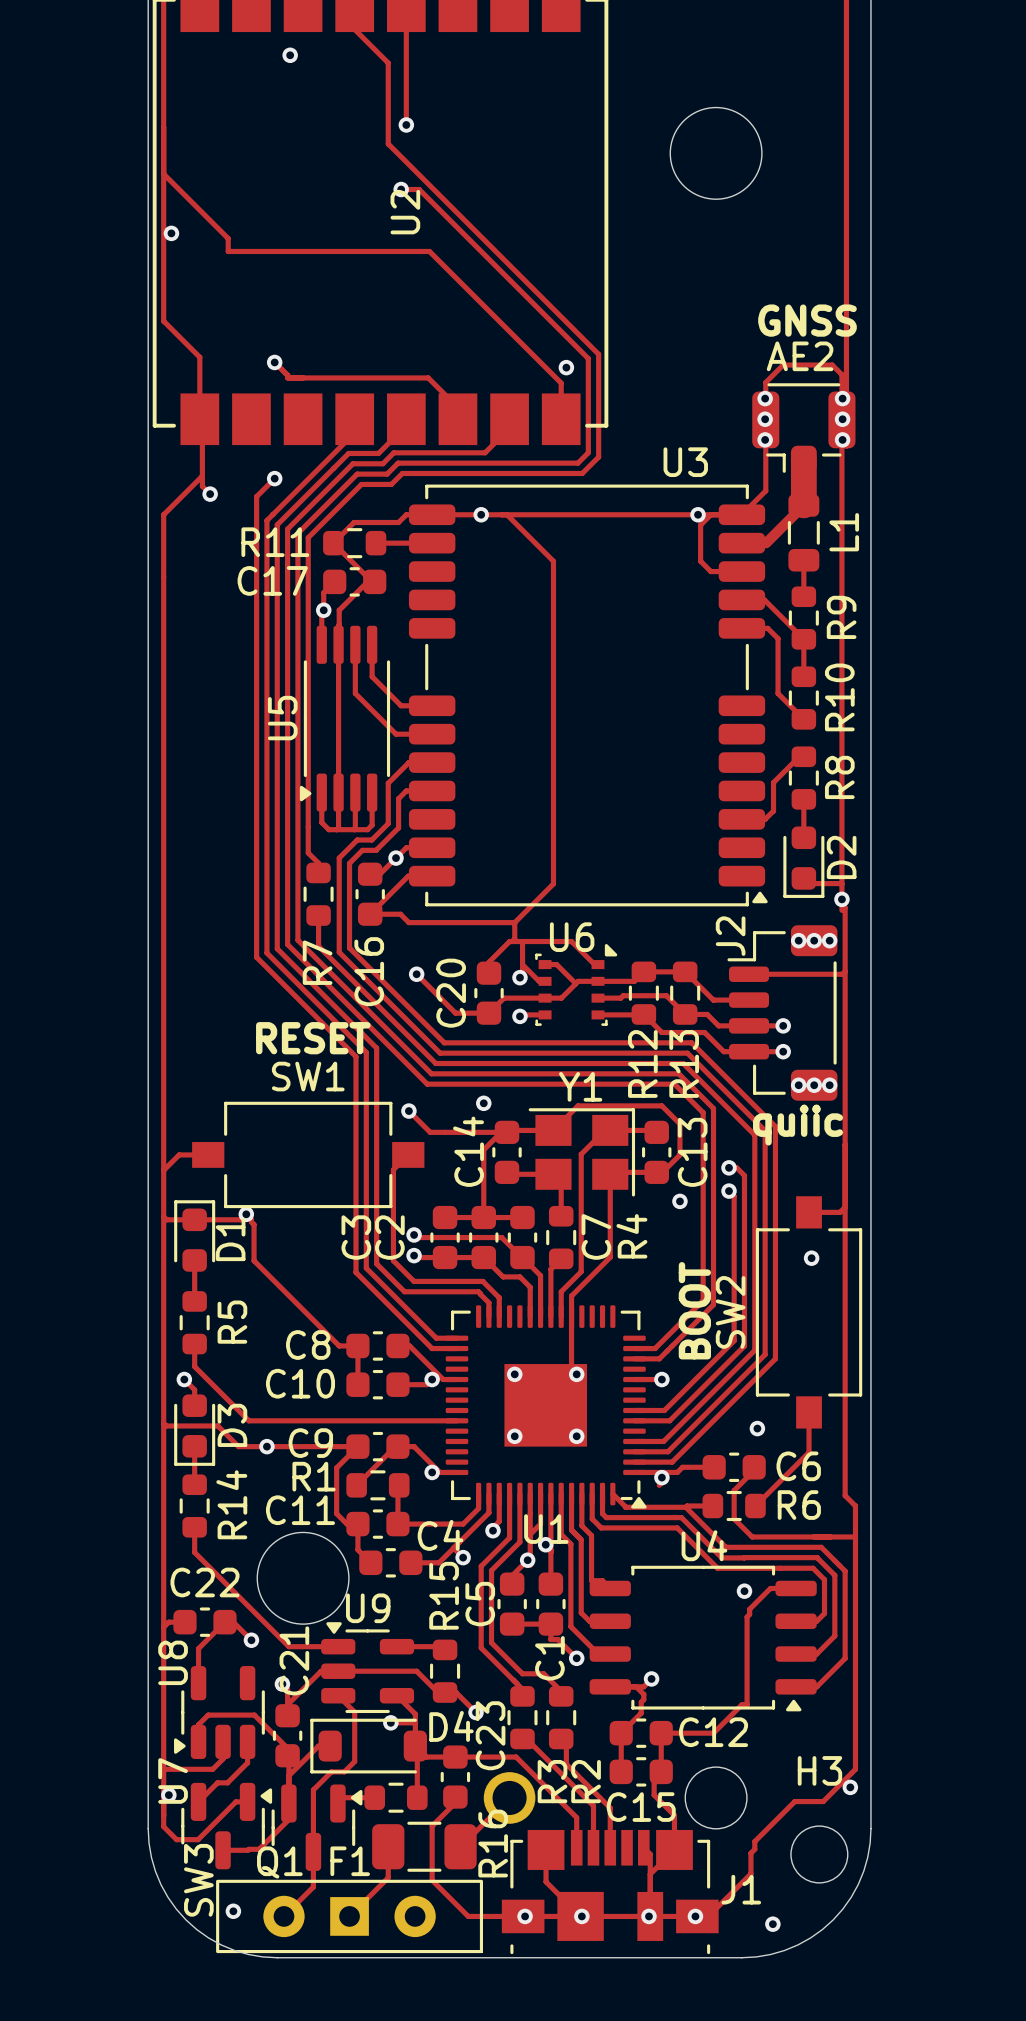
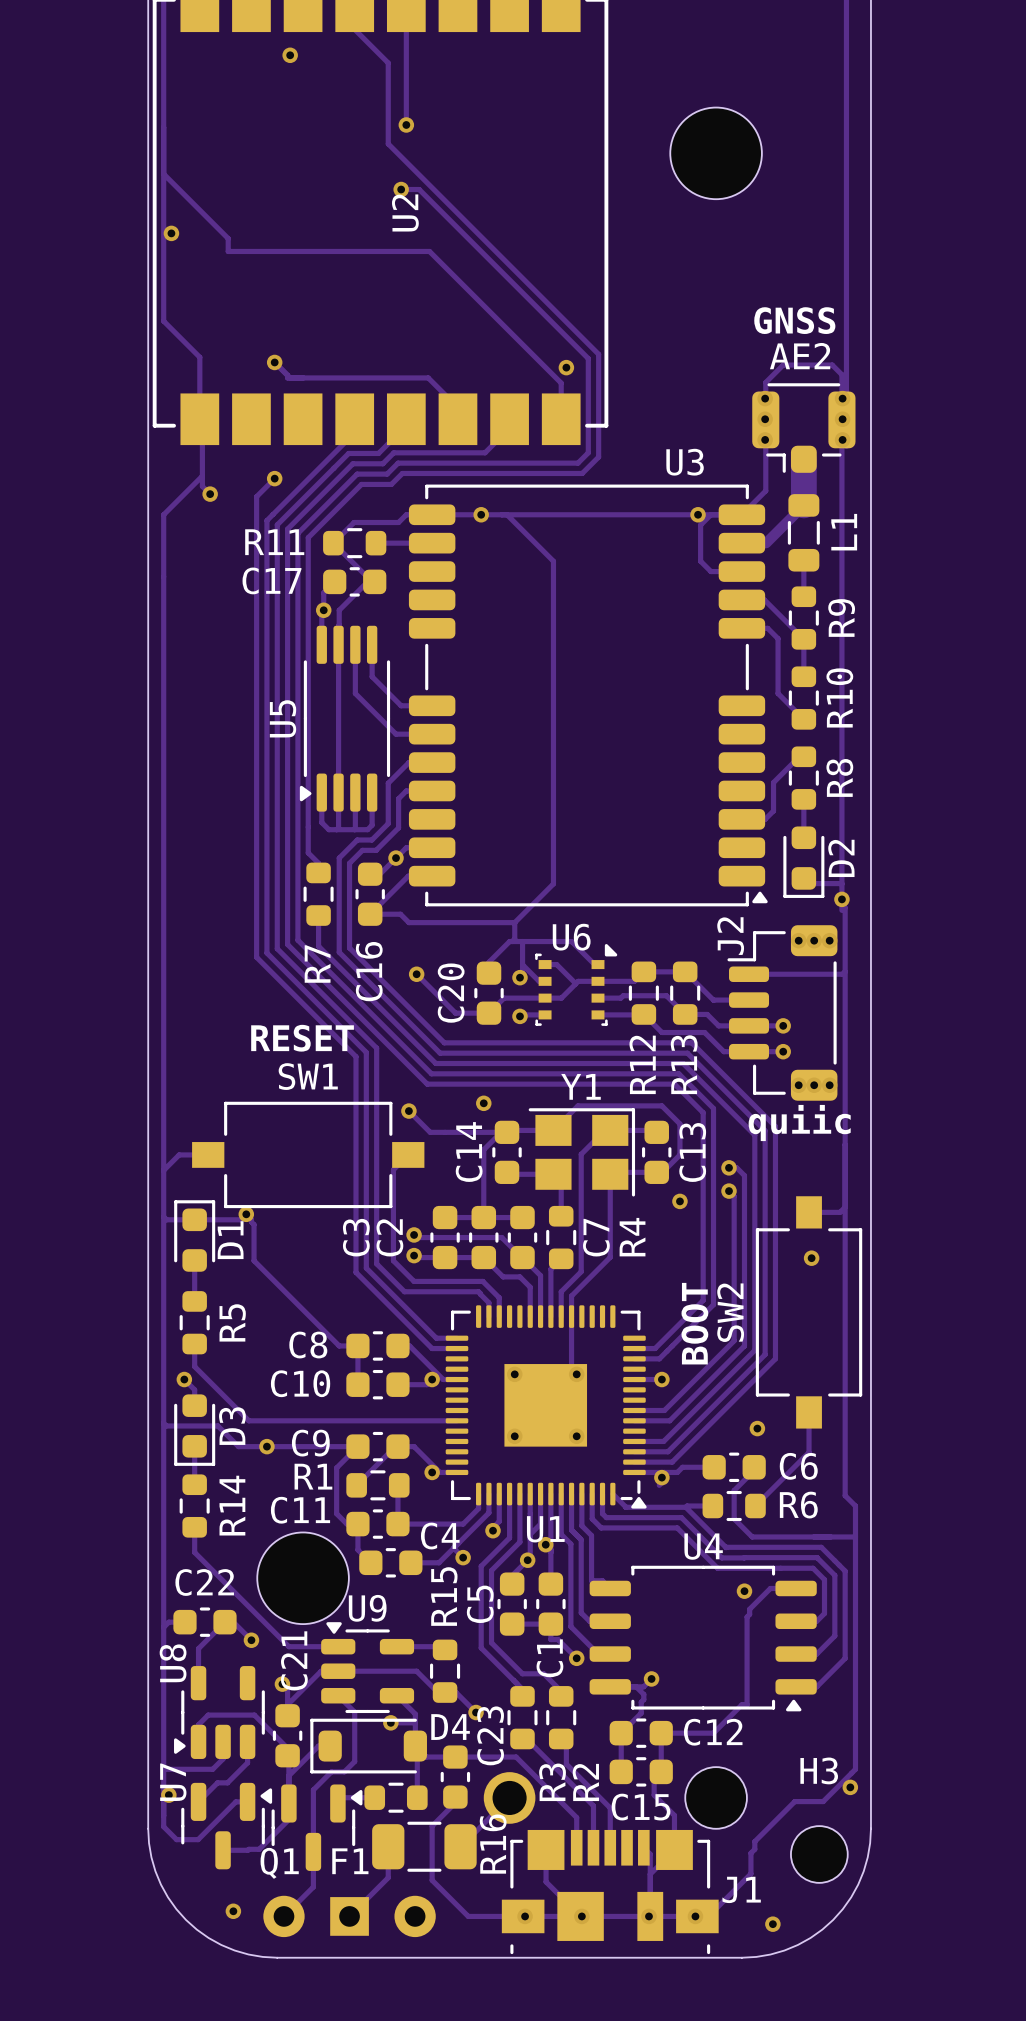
SW3 side: top (349, 1916) -> bottom (349, 1916)

